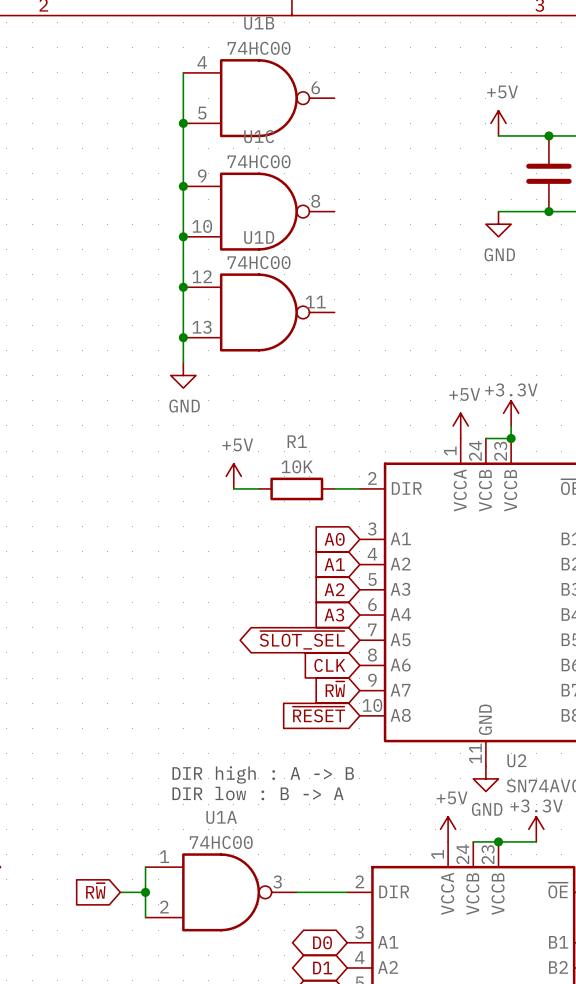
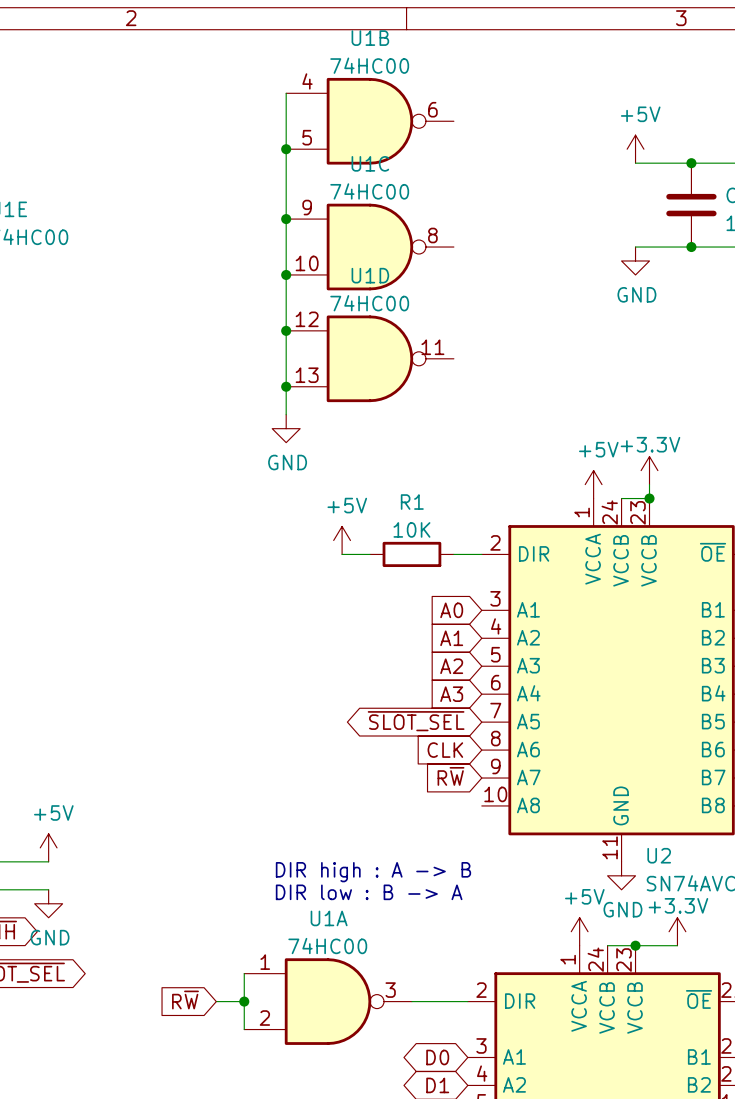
global label: ~{RESET} (318, 714) -> none

